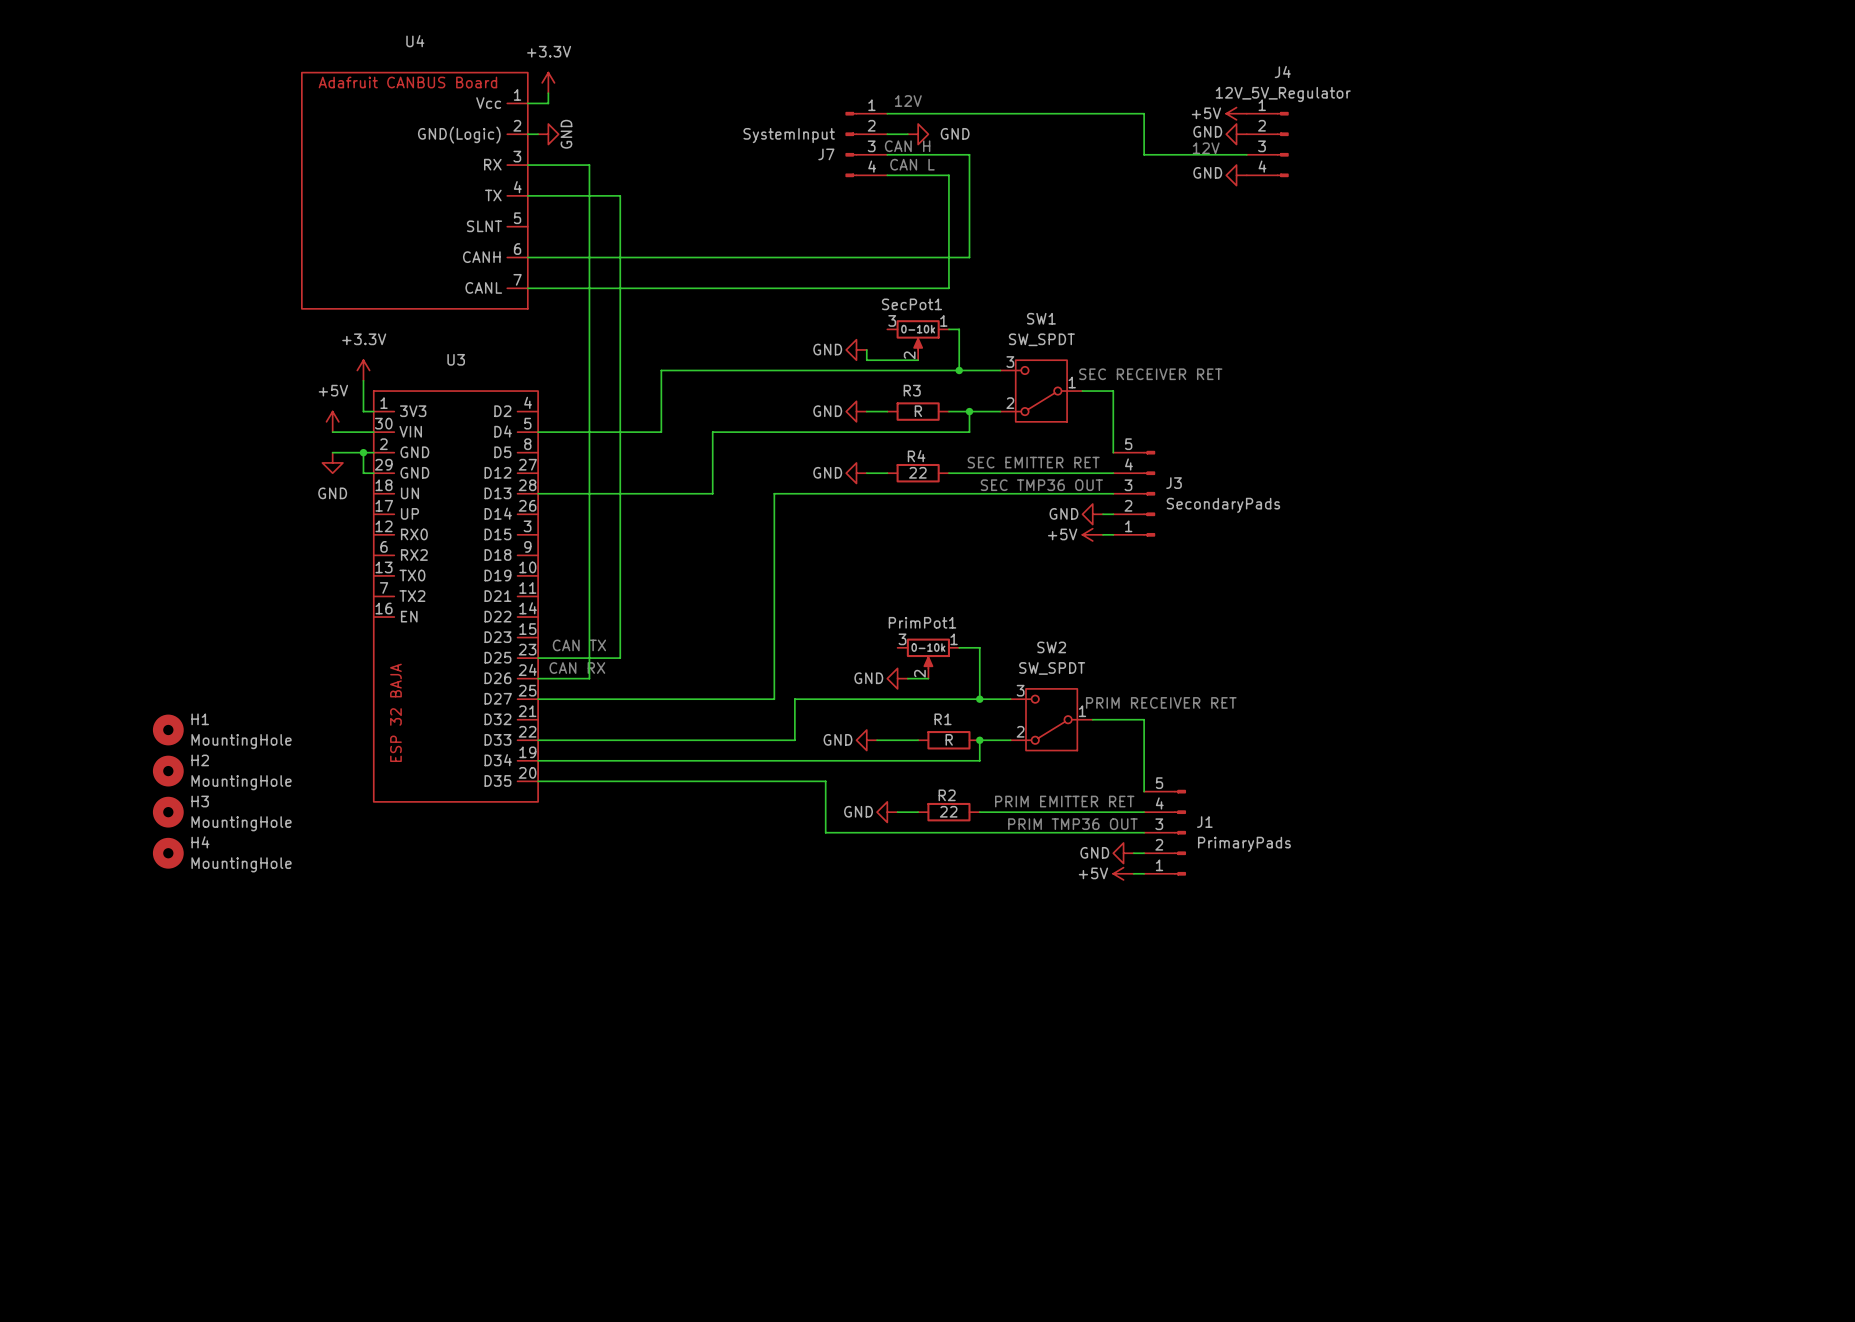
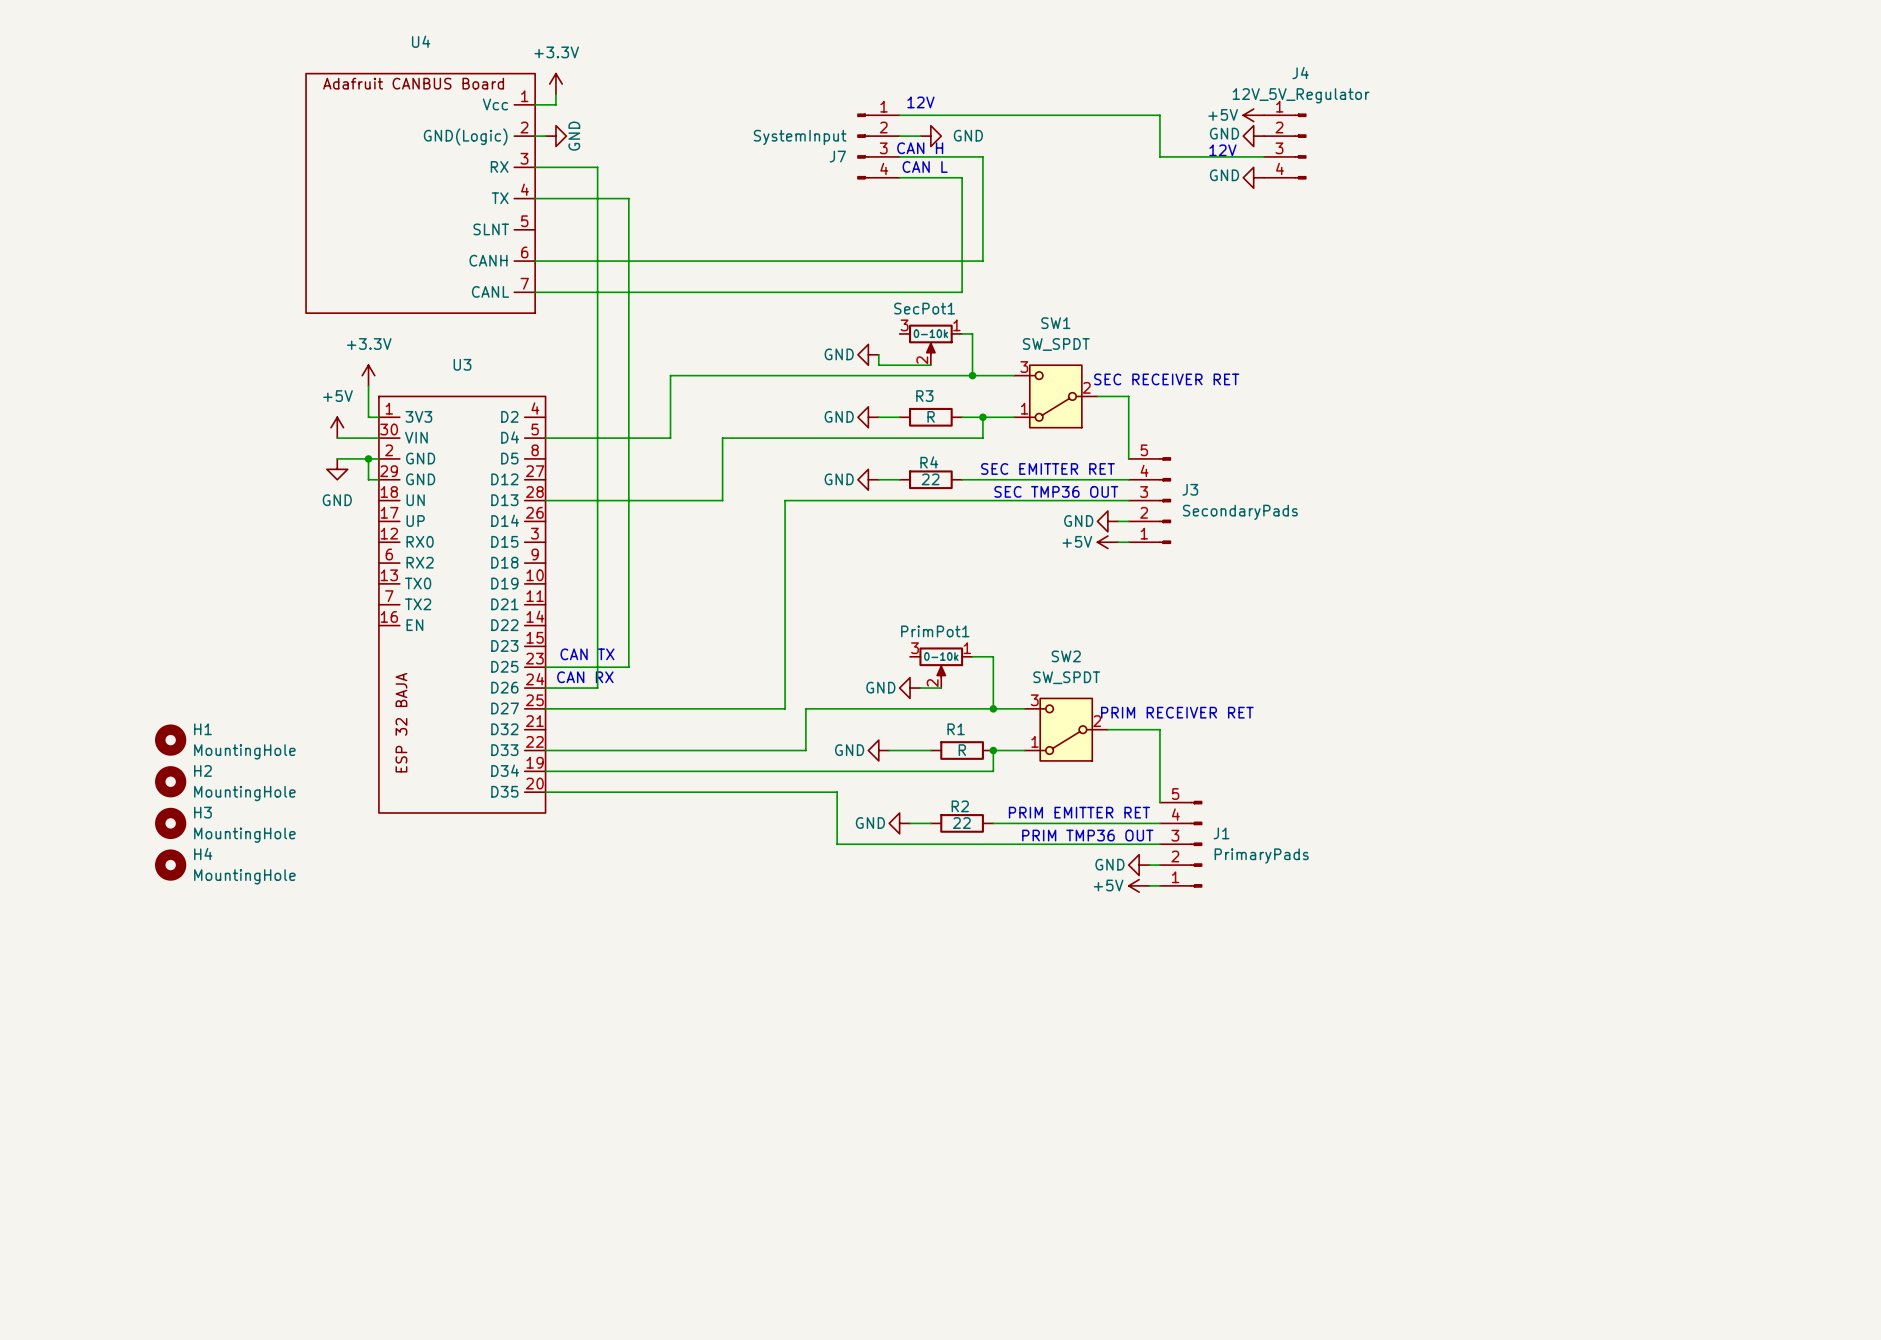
SW1 pin number: 1 (1072, 382) -> 2 (1086, 387)
SW1 pin number: 2 (1010, 403) -> 1 (1024, 408)
SW2 pin number: 1 (1082, 711) -> 2 (1097, 721)
SW2 pin number: 2 (1020, 731) -> 1 (1034, 741)

